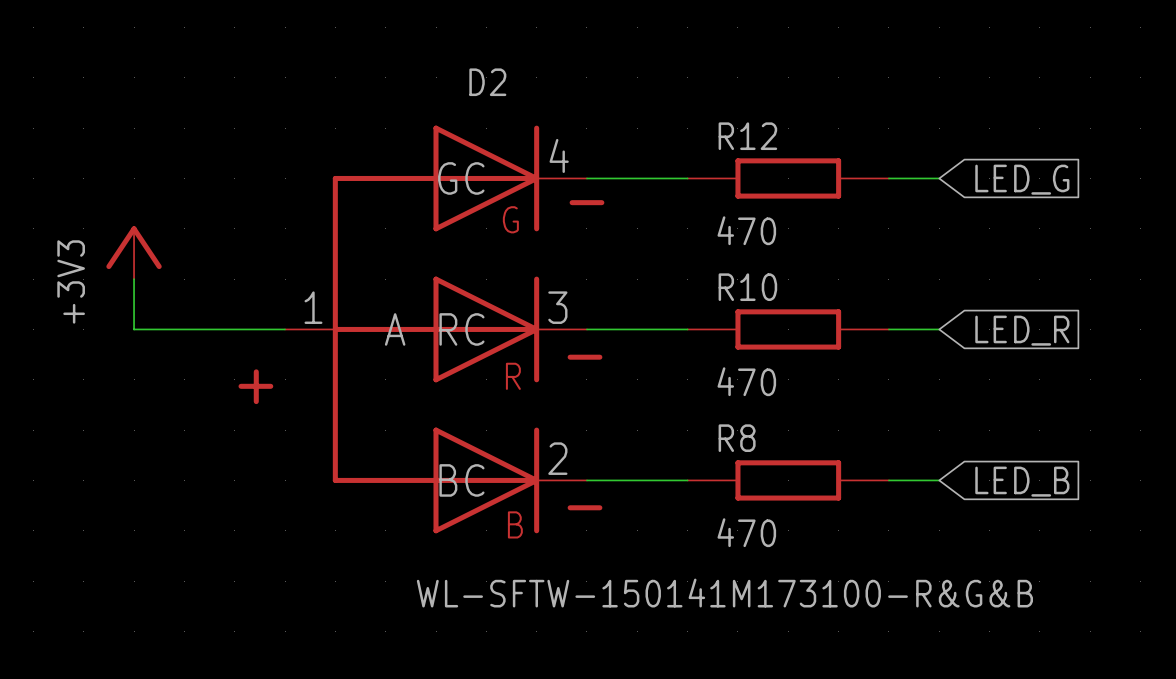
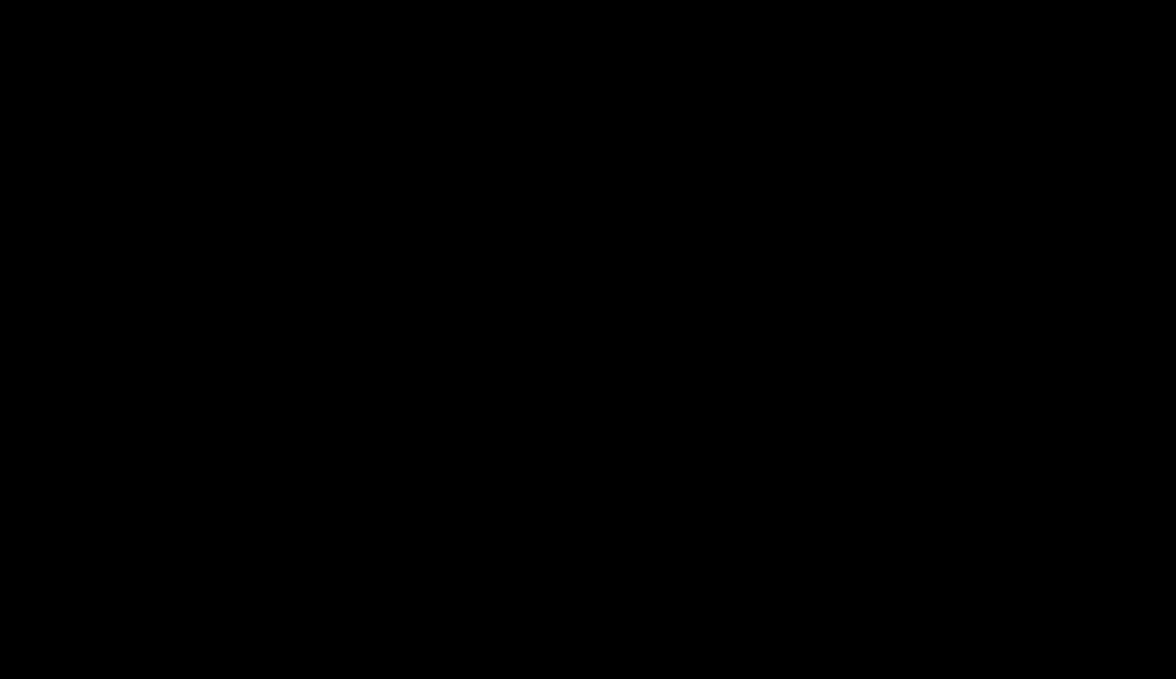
wire: (586, 178) (687, 178) -> none
R12: 470 (788, 178) -> none
wire: (888, 178) (939, 178) -> none
global label: LED_G (1022, 179) -> none
power symbol: +3V3 (134, 252) -> none
wire: (134, 279) (134, 329) (285, 329) -> none
D2: WL-SFTW-150141M173100-R&G&B (421, 329) -> none
wire: (586, 329) (687, 329) -> none
R10: 470 (788, 329) -> none
wire: (888, 329) (939, 329) -> none
global label: LED_R (1022, 330) -> none
wire: (586, 480) (687, 480) -> none
R8: 470 (788, 480) -> none
wire: (888, 480) (939, 480) -> none
global label: LED_B (1022, 481) -> none

